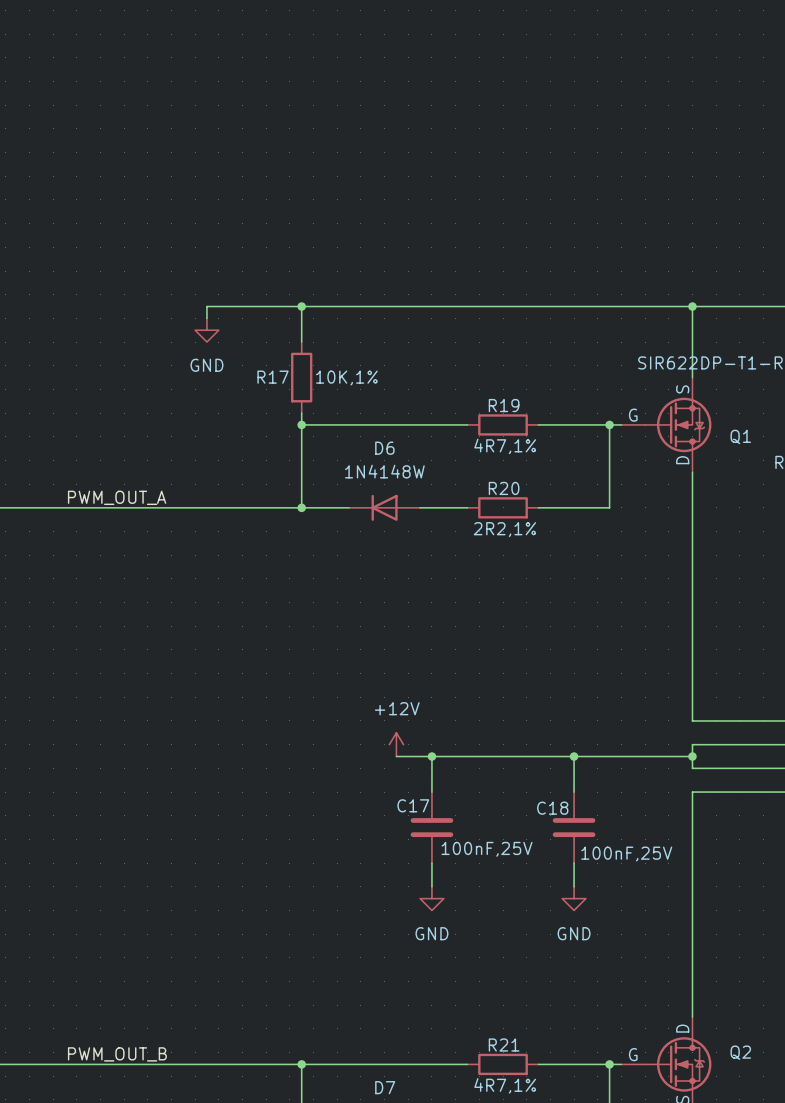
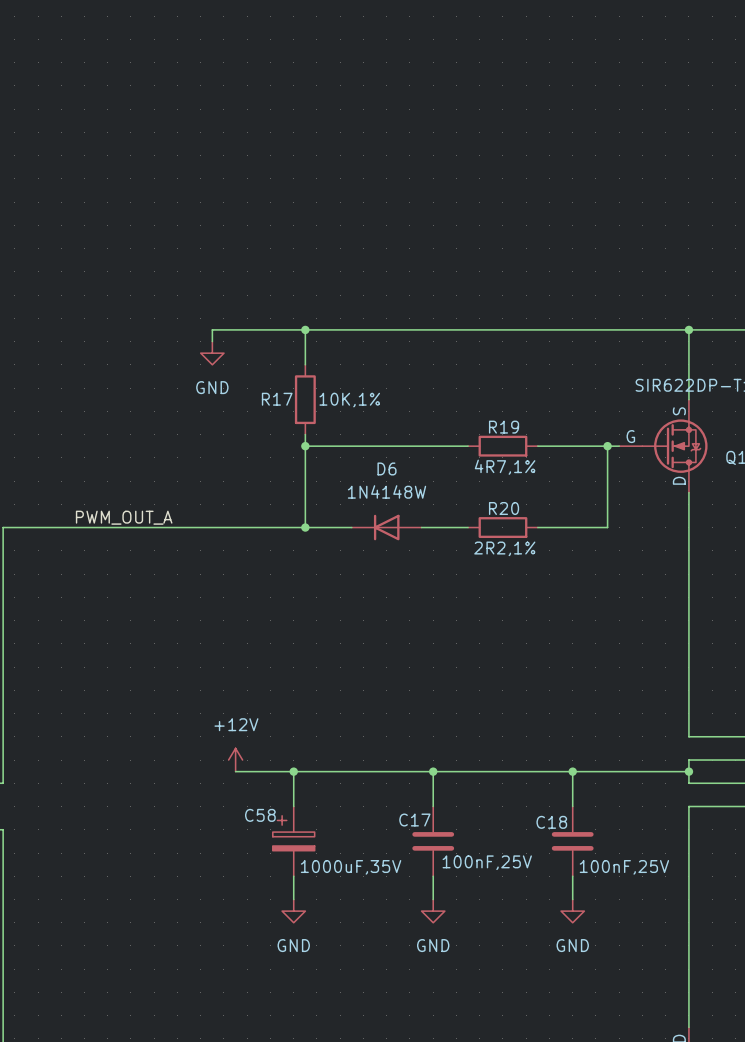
power symbol position: +12V (396, 744) -> +12V (235, 760)
wire: none -> (235, 771) (398, 771)
wire: none -> (293, 771) (293, 806)
junction: none -> (293, 771)
C58: none -> 1000uF,35V (293, 841)
wire: none -> (293, 876) (293, 899)
power symbol: none -> GND (293, 911)

